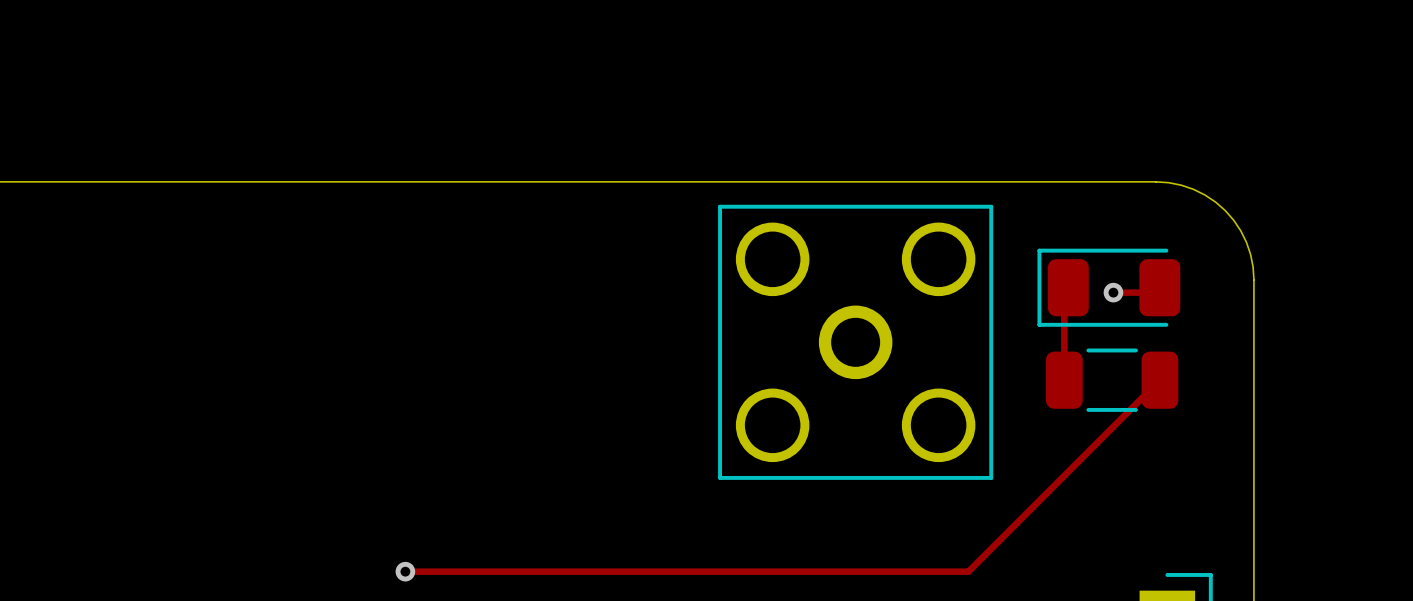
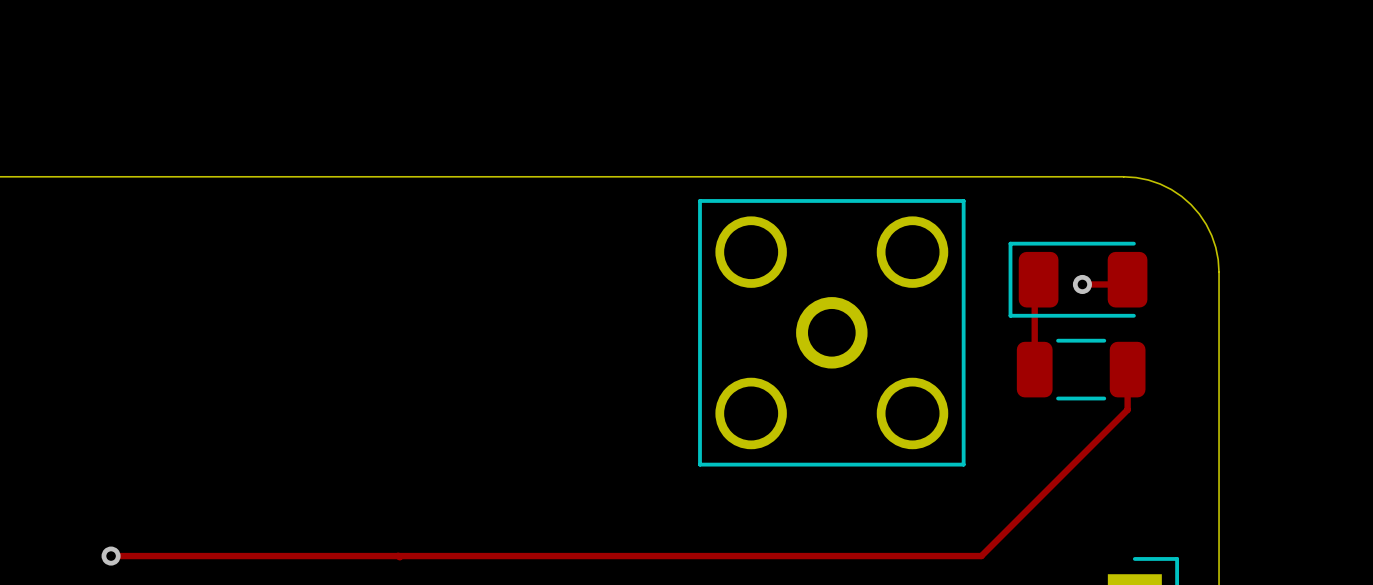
track: (1159, 380) (968, 571) (405, 571) -> (1127, 369) (1127, 409) (981, 556) (111, 556)
via: none -> (111, 556)
via: (405, 571) -> none

